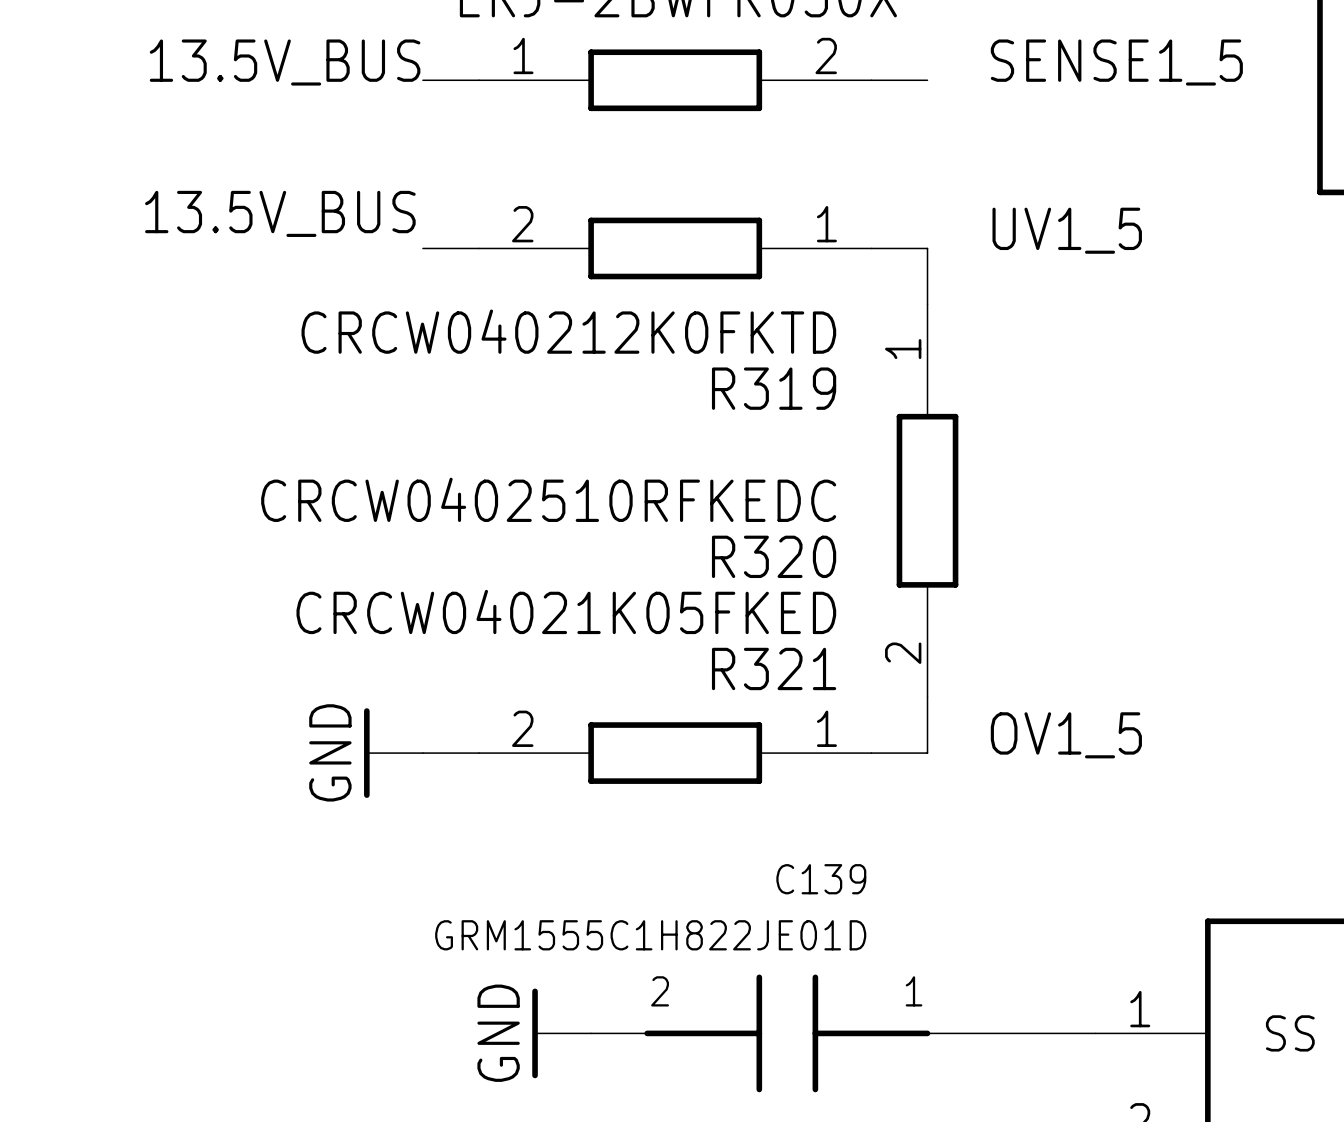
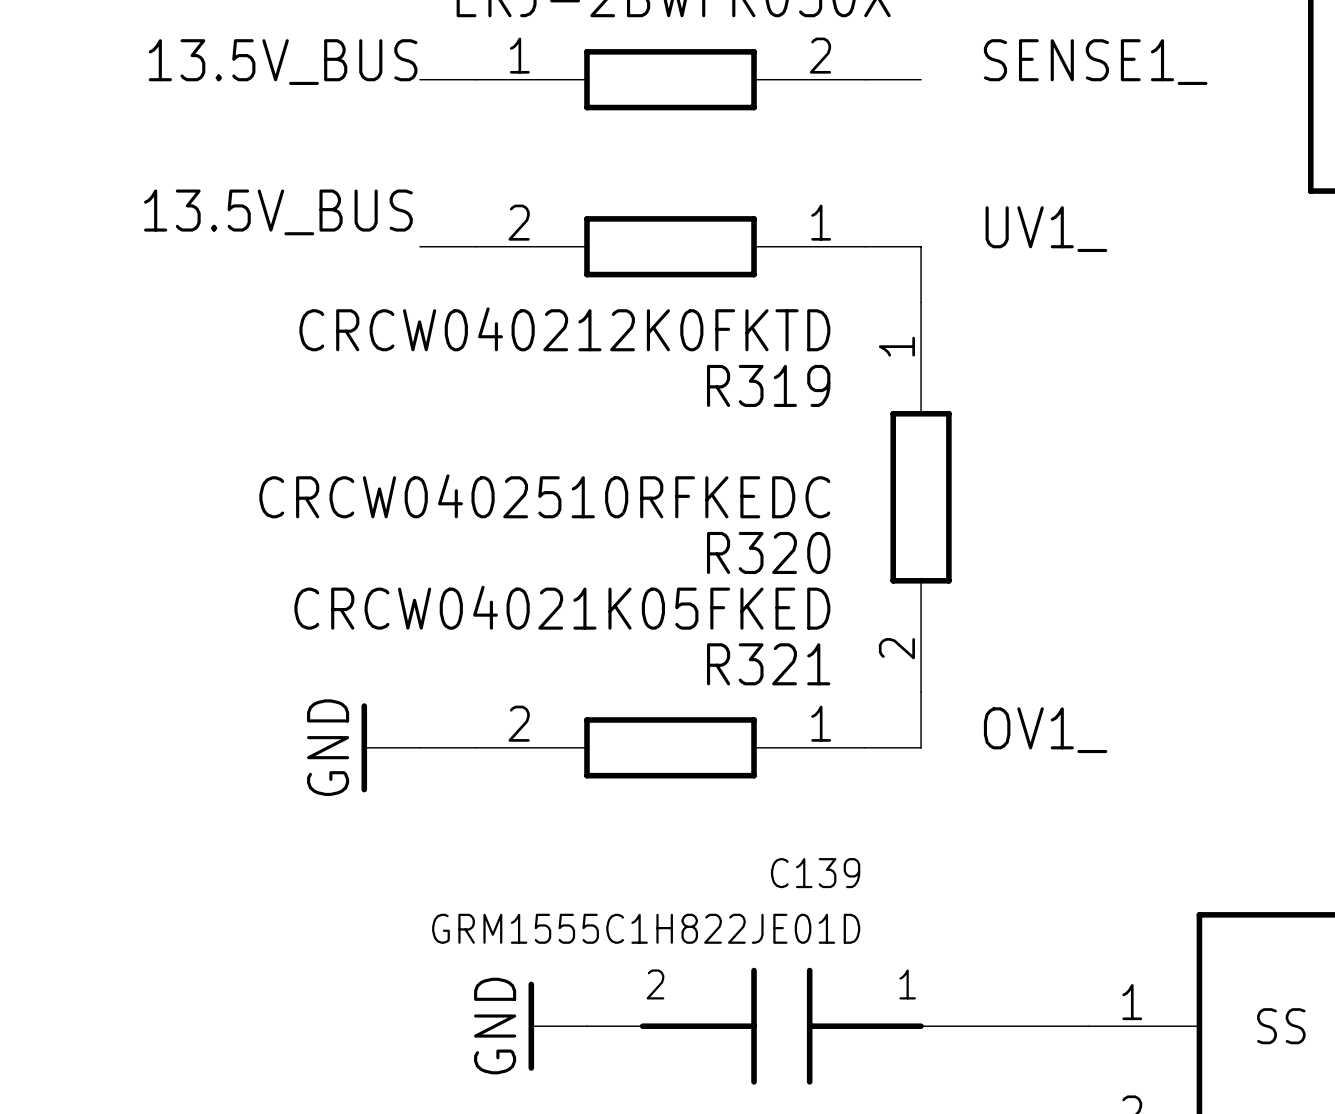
label: SENSE1_5 (1116, 62) -> SENSE1_ (1095, 62)
label: UV1_5 (1067, 230) -> UV1_ (1046, 229)
label: OV1_5 (1066, 735) -> OV1_ (1045, 730)

